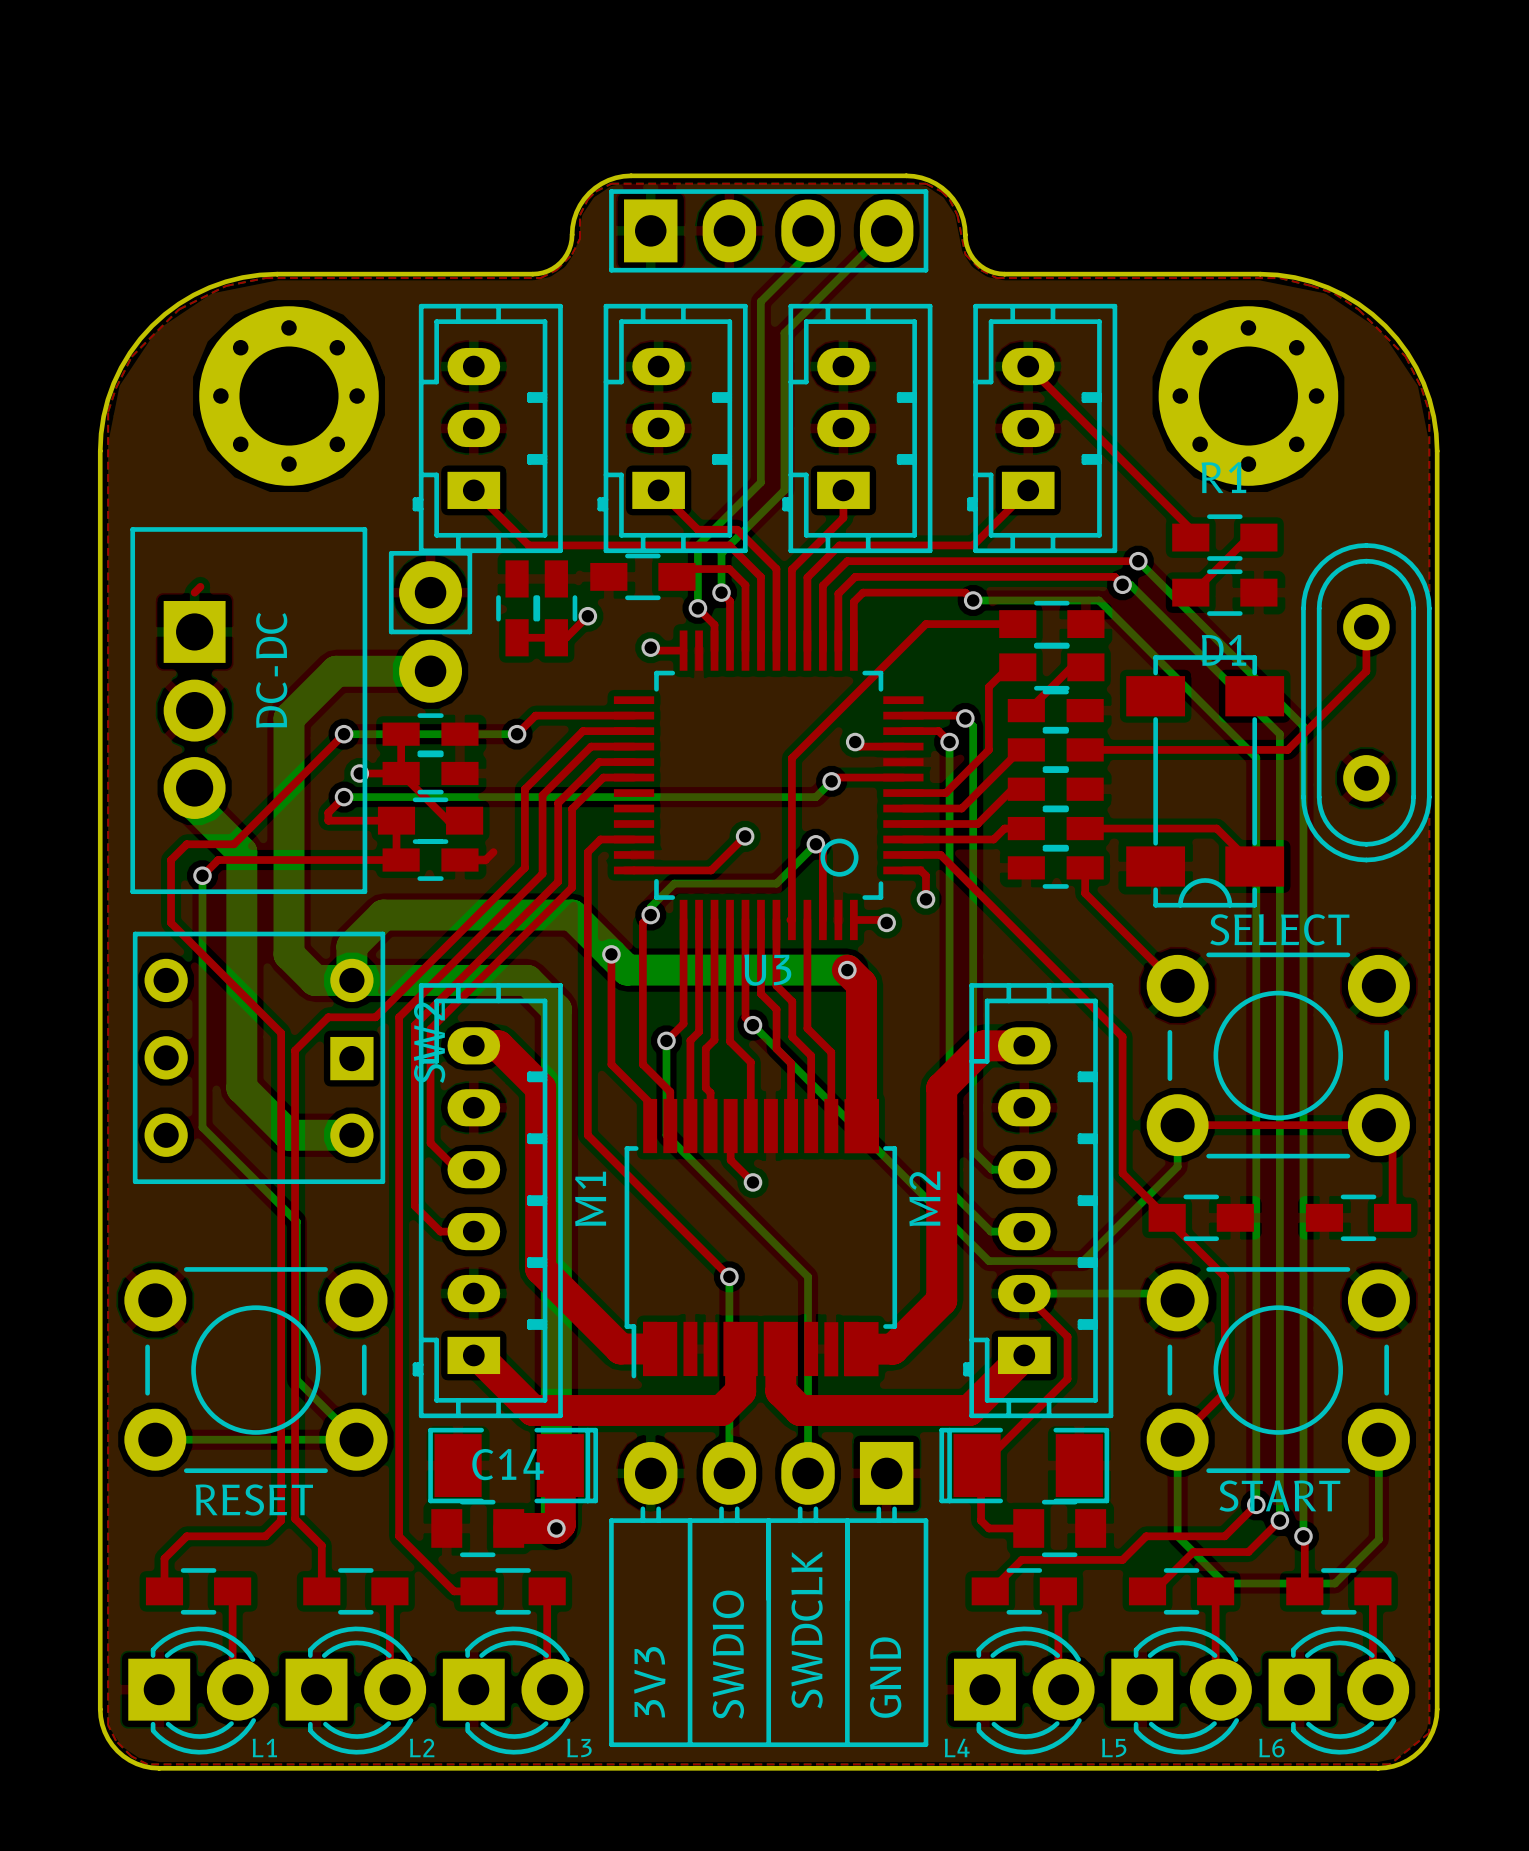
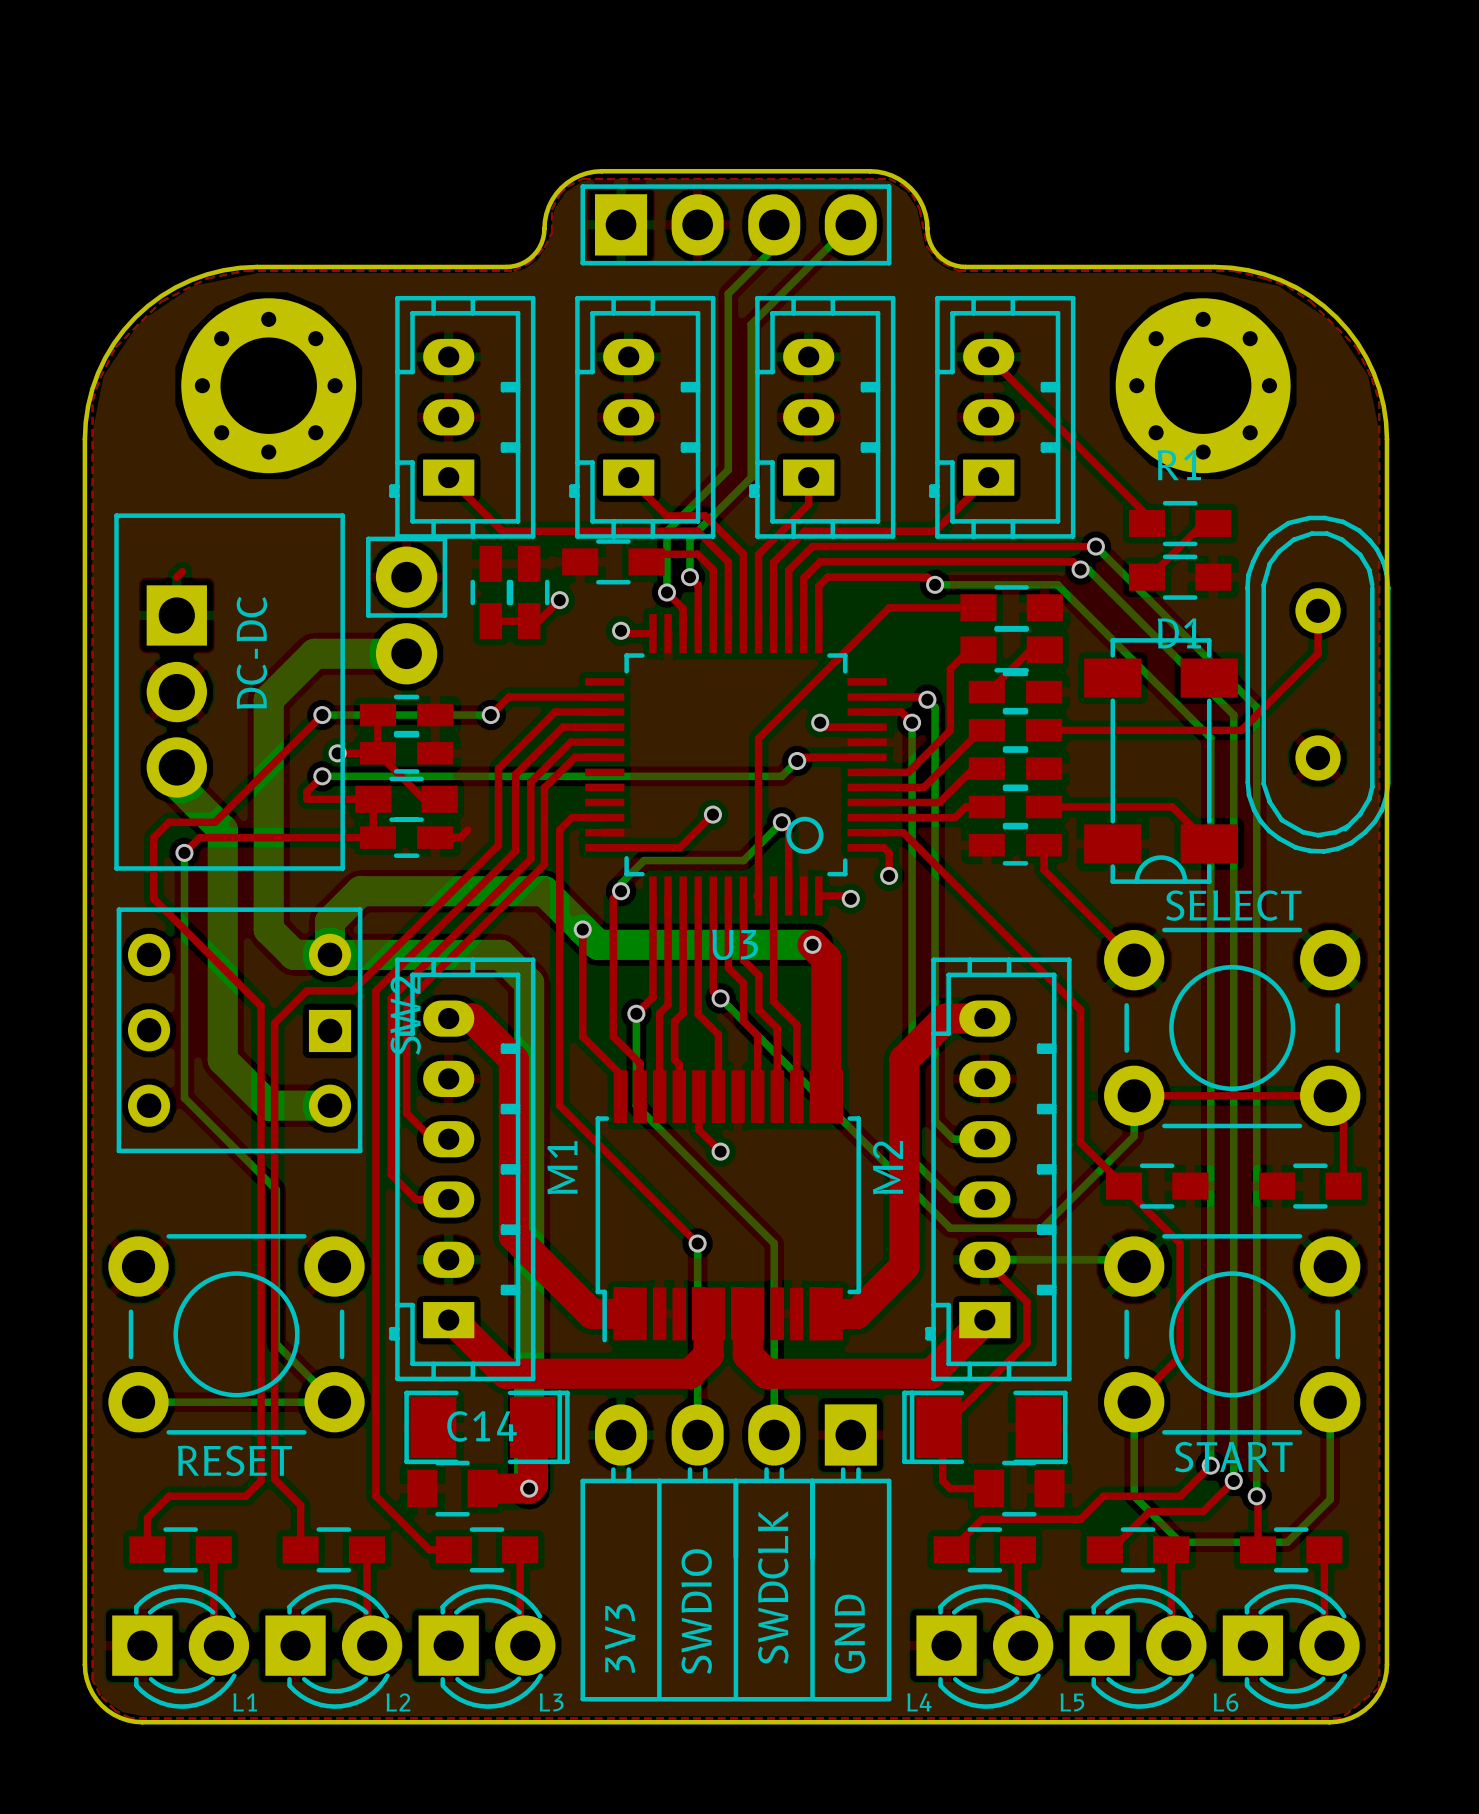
part footprint: [1301, 543, 1432, 863] -> [1245, 515, 1391, 854]

